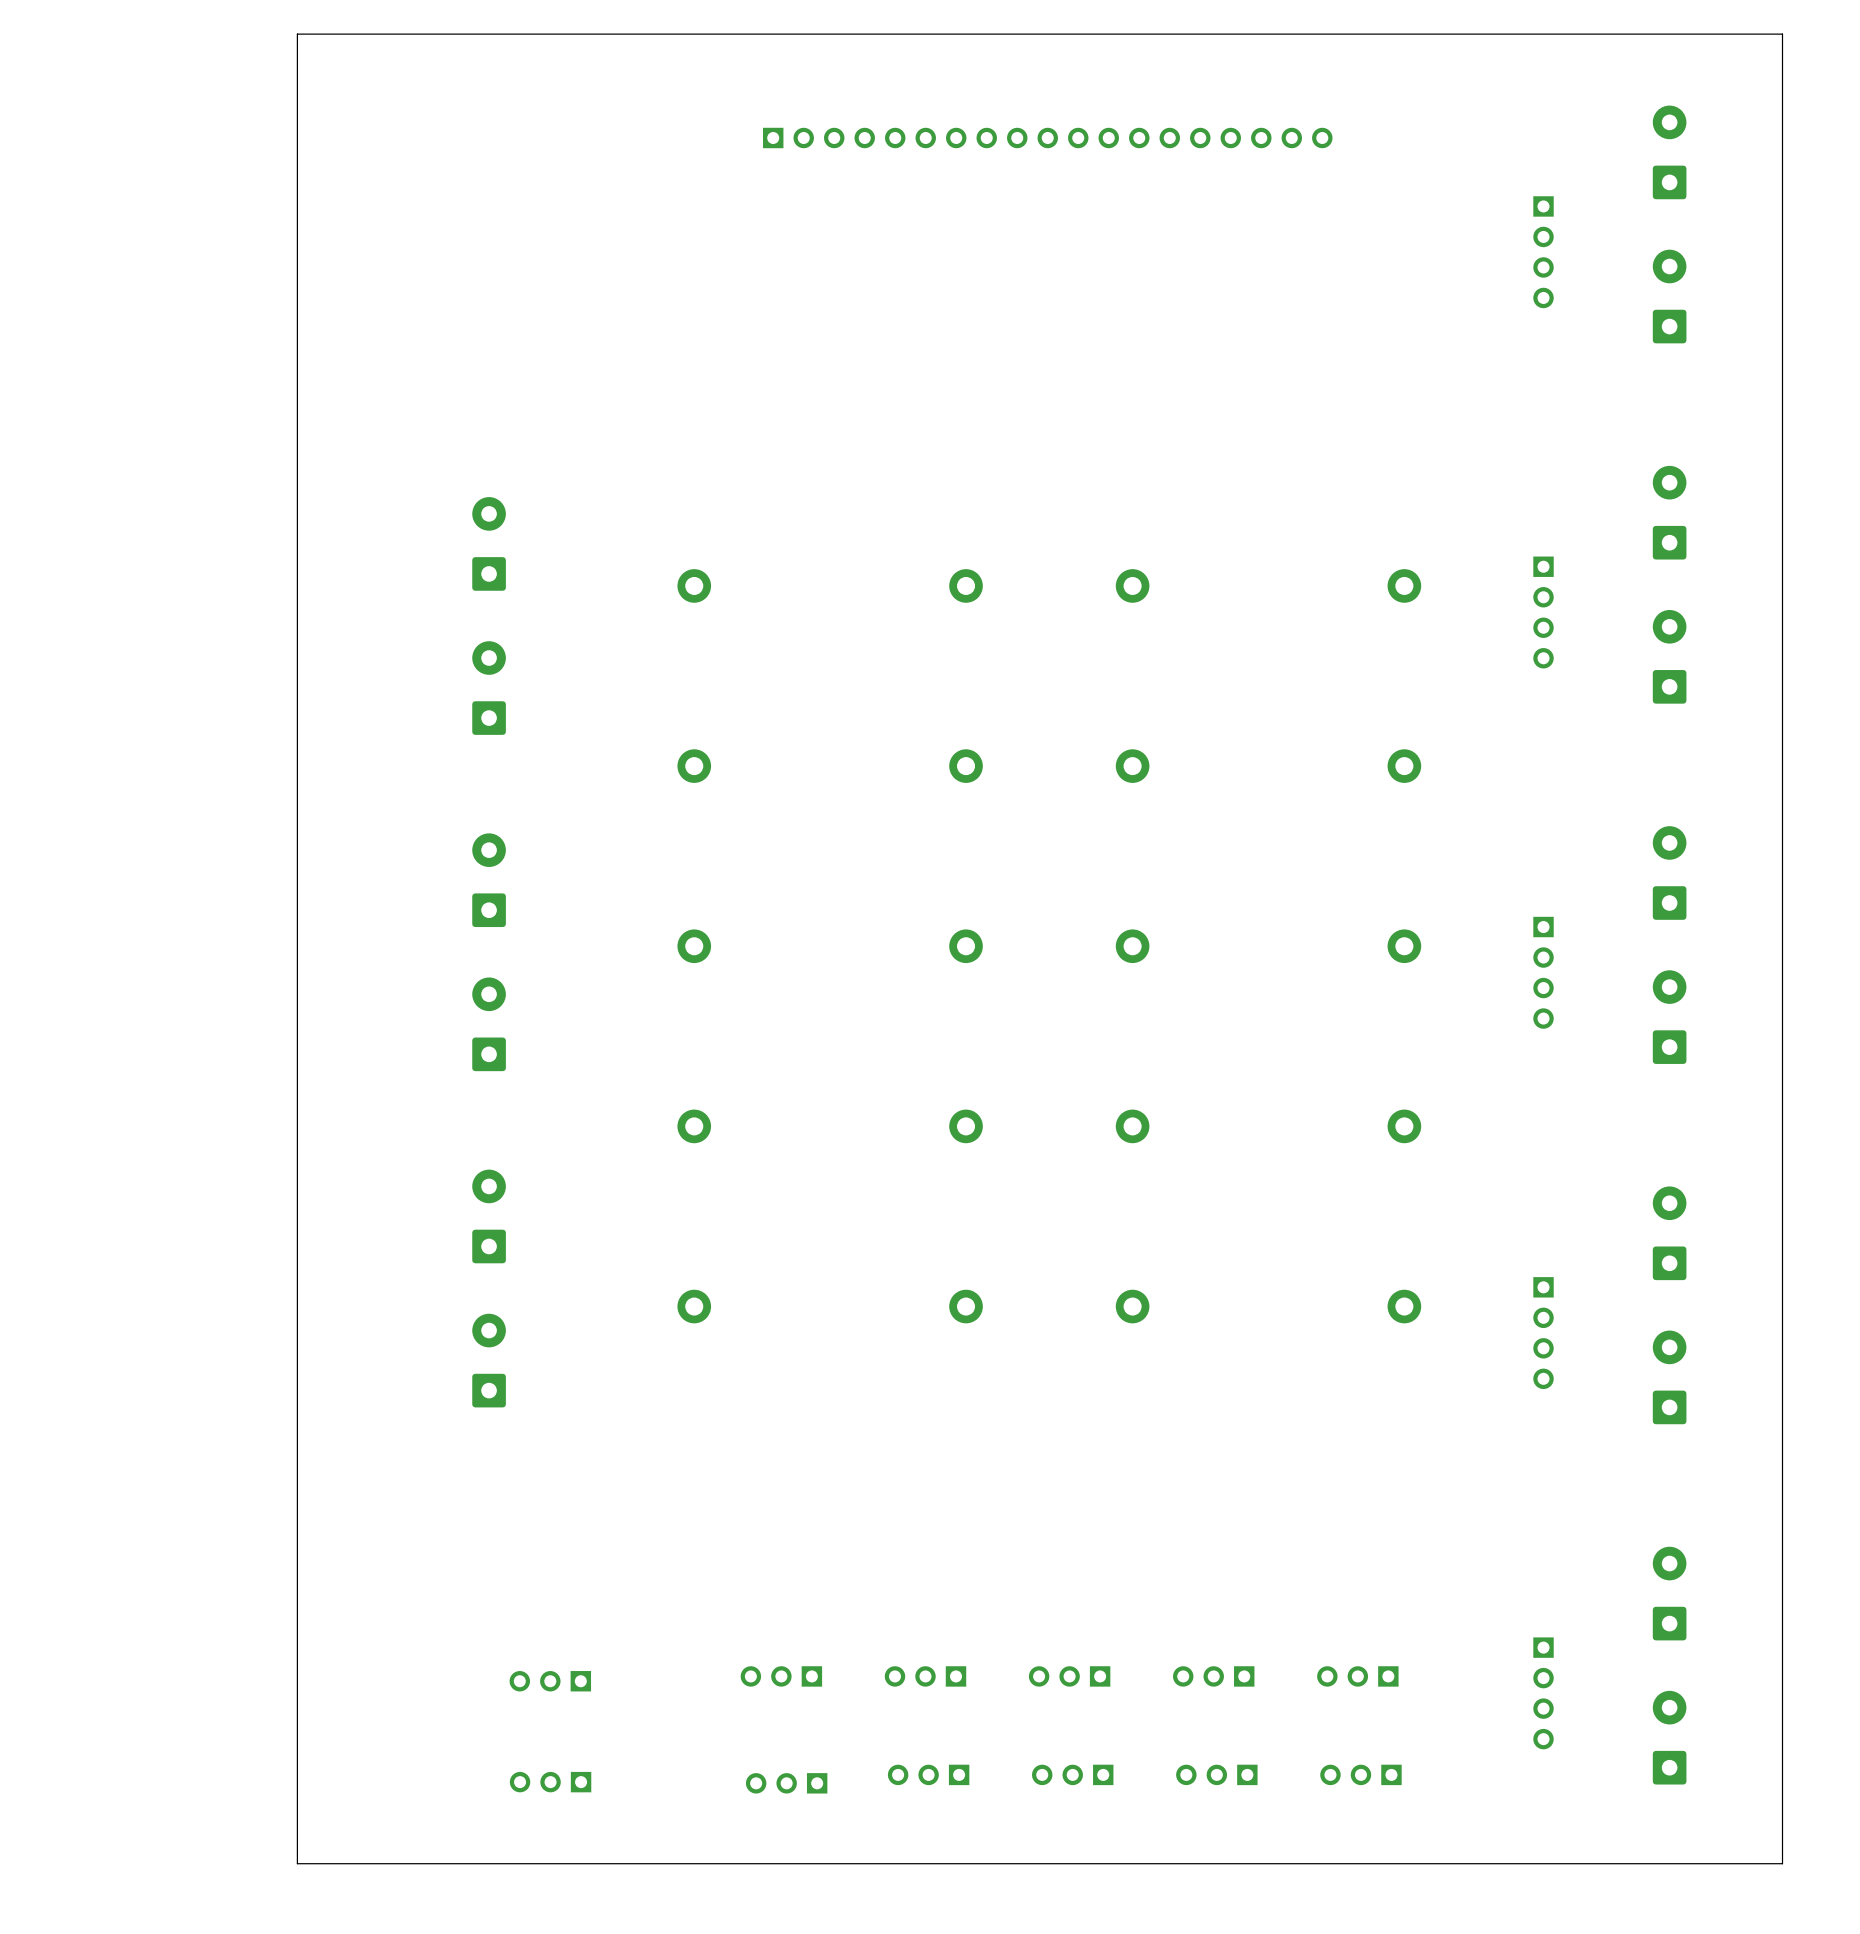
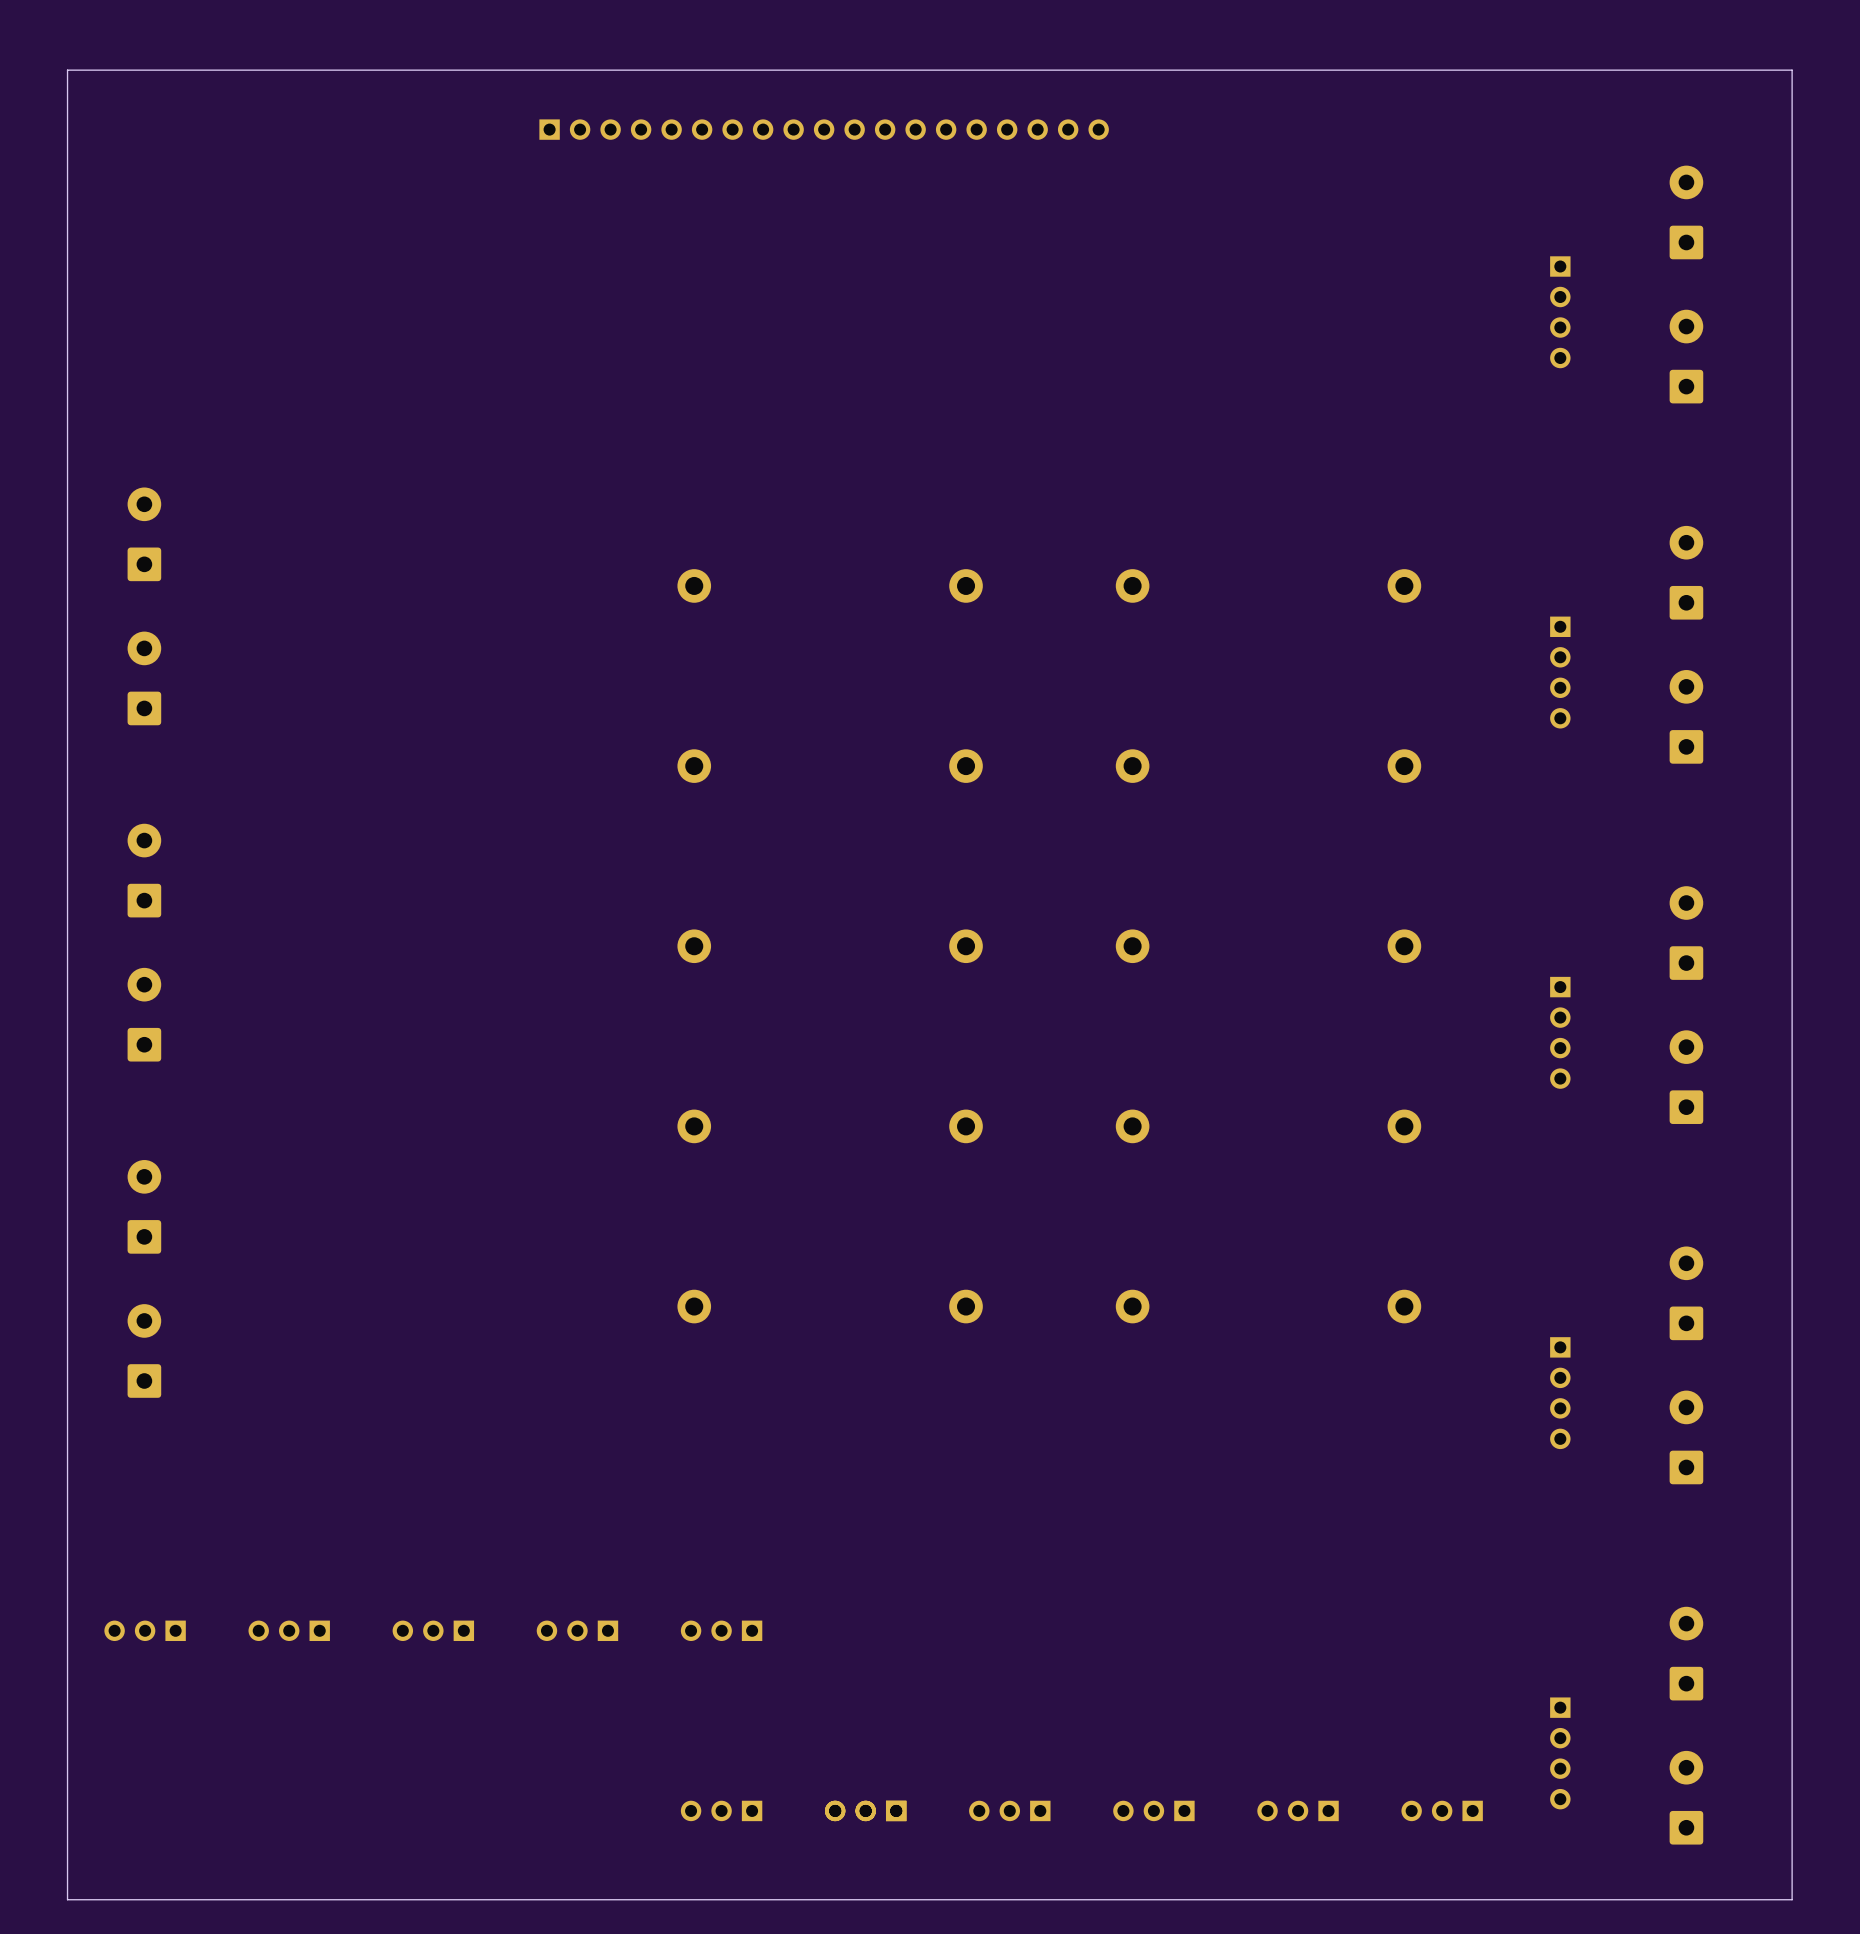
board edge: (1782, 34) (297, 34) (297, 1863) (1782, 1863) (1782, 34) -> (1792, 70) (1792, 1899) (67, 1899) (67, 70) (1792, 70)
part position: (1047, 138) -> (824, 129)
part: (1669, 152) -> none
part: none -> (1686, 212)
part position: (1543, 252) -> (1560, 312)
part: (1669, 296) -> none
part: none -> (1686, 356)
part: (1669, 512) -> none
part: none -> (144, 534)
part: (489, 543) -> none
part: none -> (1686, 572)
part position: (1543, 612) -> (1560, 672)
part: (1669, 656) -> none
part: none -> (144, 678)
part: (489, 688) -> none
part: none -> (1686, 716)
part: none -> (144, 870)
part: (1669, 872) -> none
part: (489, 880) -> none
part: none -> (1686, 933)
part position: (1543, 972) -> (1560, 1032)
part: none -> (144, 1014)
part: (1669, 1017) -> none
part: (489, 1024) -> none
part: none -> (1686, 1077)
part: none -> (144, 1206)
part: (489, 1216) -> none
part: (1669, 1233) -> none
part: none -> (1686, 1293)
part position: (1543, 1333) -> (1560, 1393)
part: none -> (144, 1350)
part: (489, 1360) -> none
part: (1669, 1377) -> none
part: none -> (1686, 1437)
part: (1669, 1593) -> none
part: none -> (145, 1630)
part: none -> (289, 1630)
part: none -> (433, 1630)
part: none -> (721, 1630)
part: none -> (1686, 1653)
part: (781, 1676) -> none
part: (925, 1676) -> none
part: (1069, 1676) -> none
part: (1213, 1676) -> none
part: (1357, 1676) -> none
part position: (550, 1681) -> (577, 1630)
part position: (1543, 1693) -> (1560, 1753)
part: (1669, 1737) -> none
part: (928, 1774) -> none
part: (1072, 1774) -> none
part: (1216, 1774) -> none
part: (1360, 1774) -> none
part: (550, 1782) -> none
part: (786, 1783) -> none
part: none -> (1686, 1797)
part: none -> (721, 1810)
part: none -> (865, 1810)
part: none -> (1009, 1810)
part: none -> (1153, 1810)
part: none -> (1298, 1810)
part: none -> (1442, 1810)

